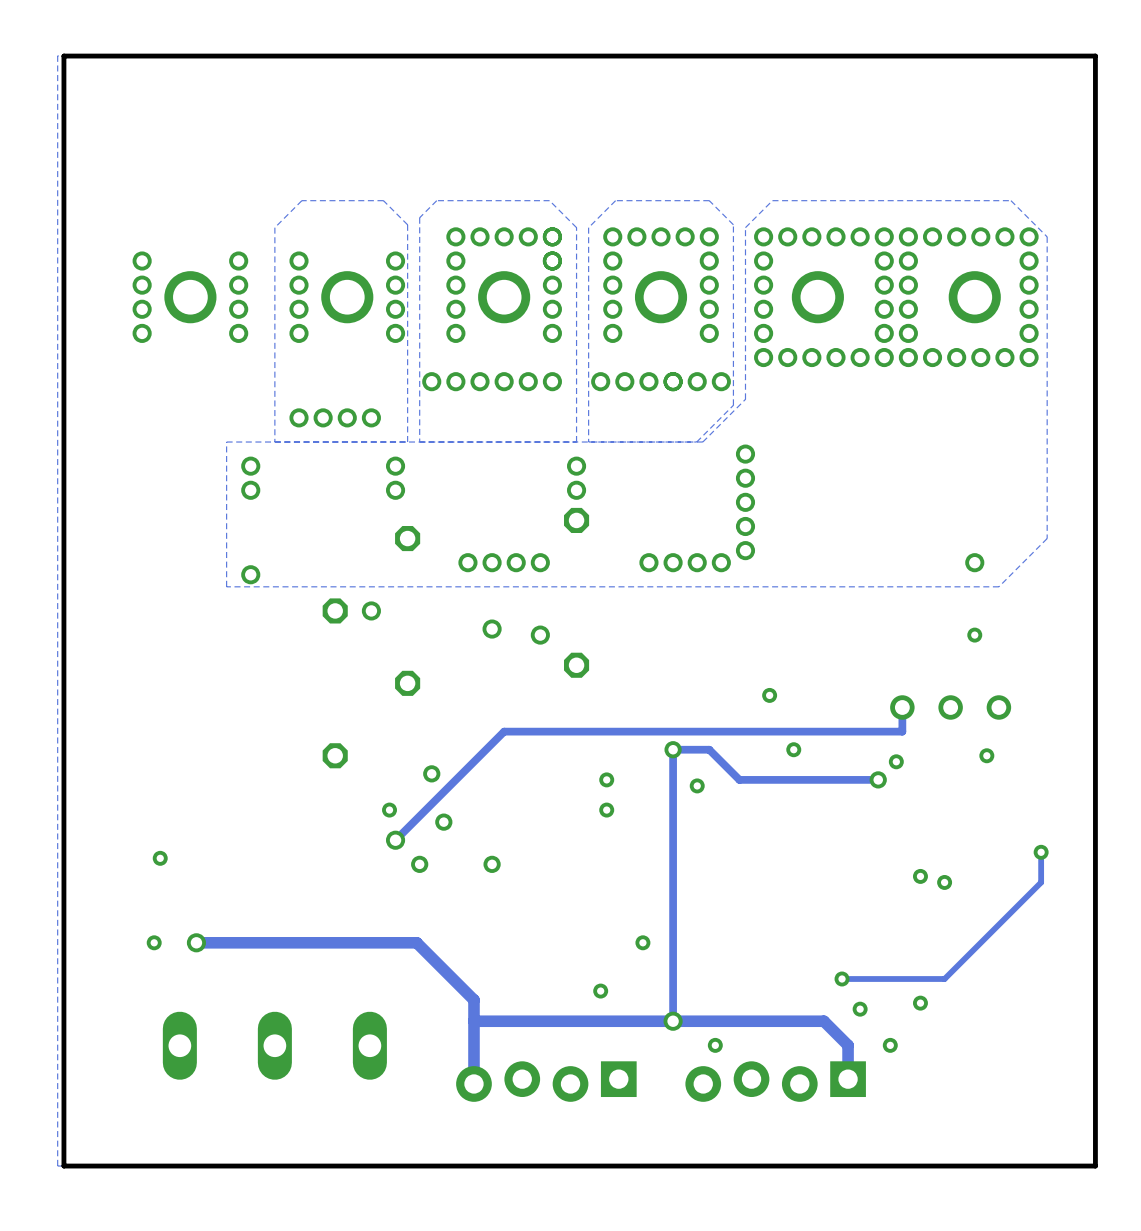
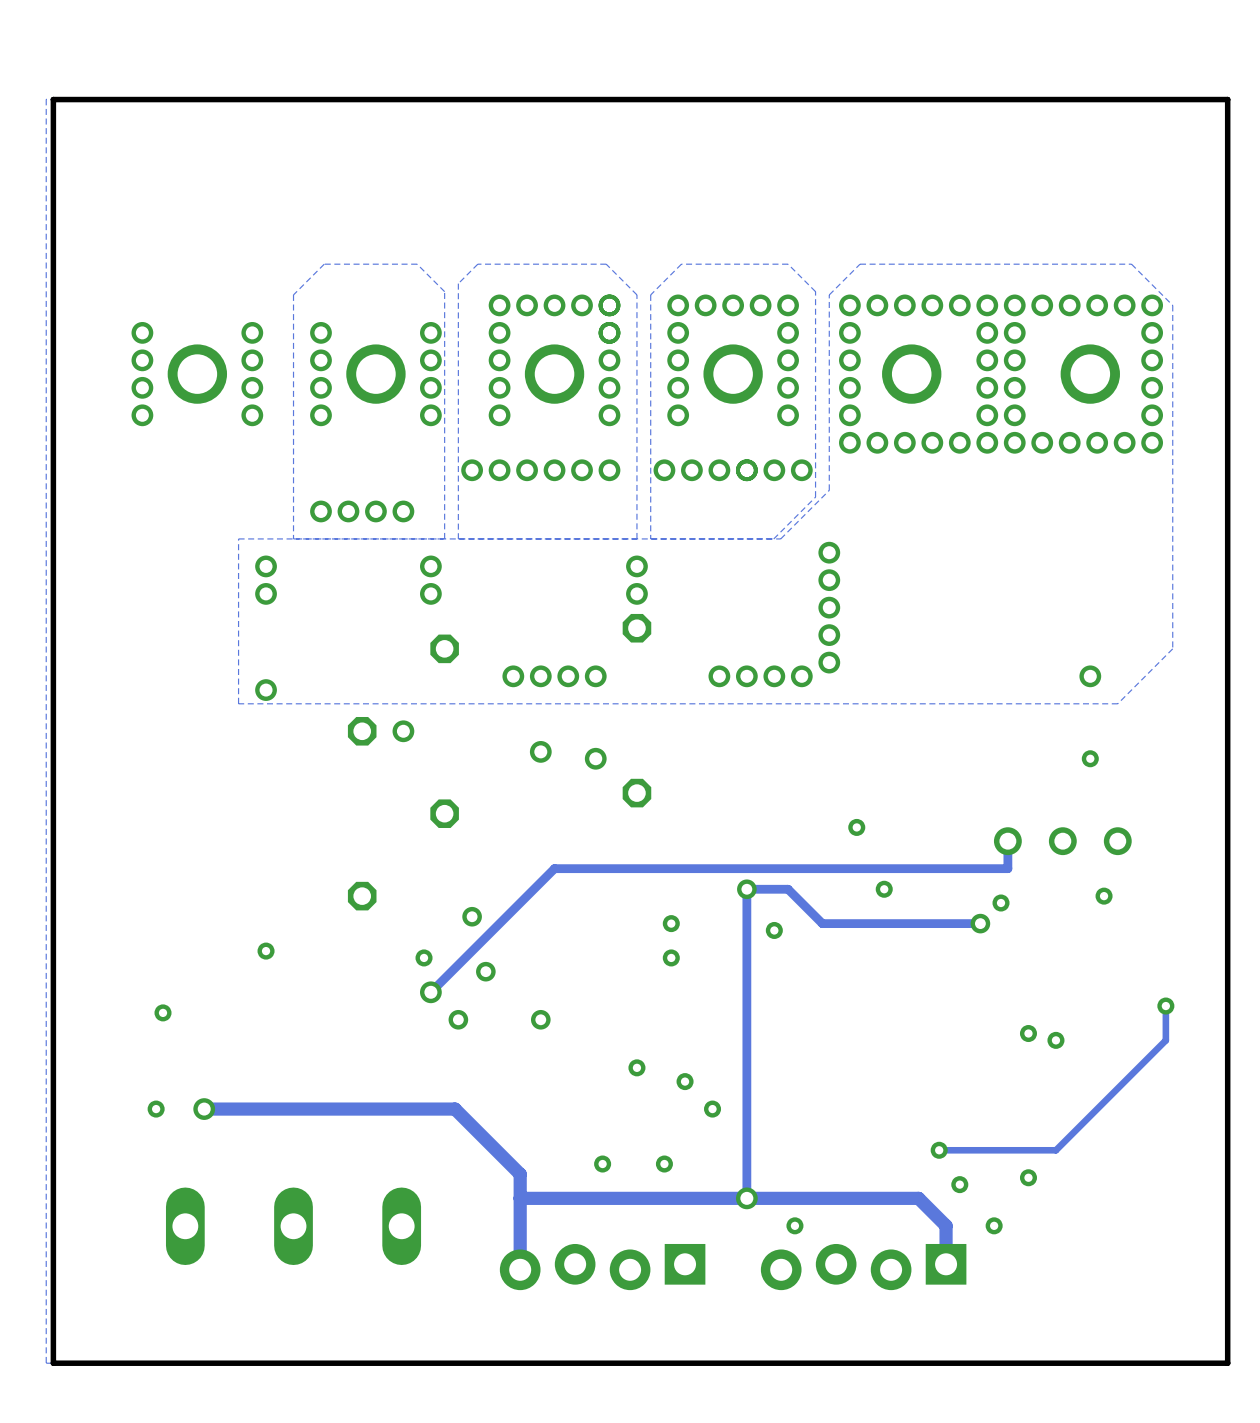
via: none -> (266, 951)
via: none -> (636, 1067)
via: none -> (685, 1081)
via: none -> (602, 1164)

